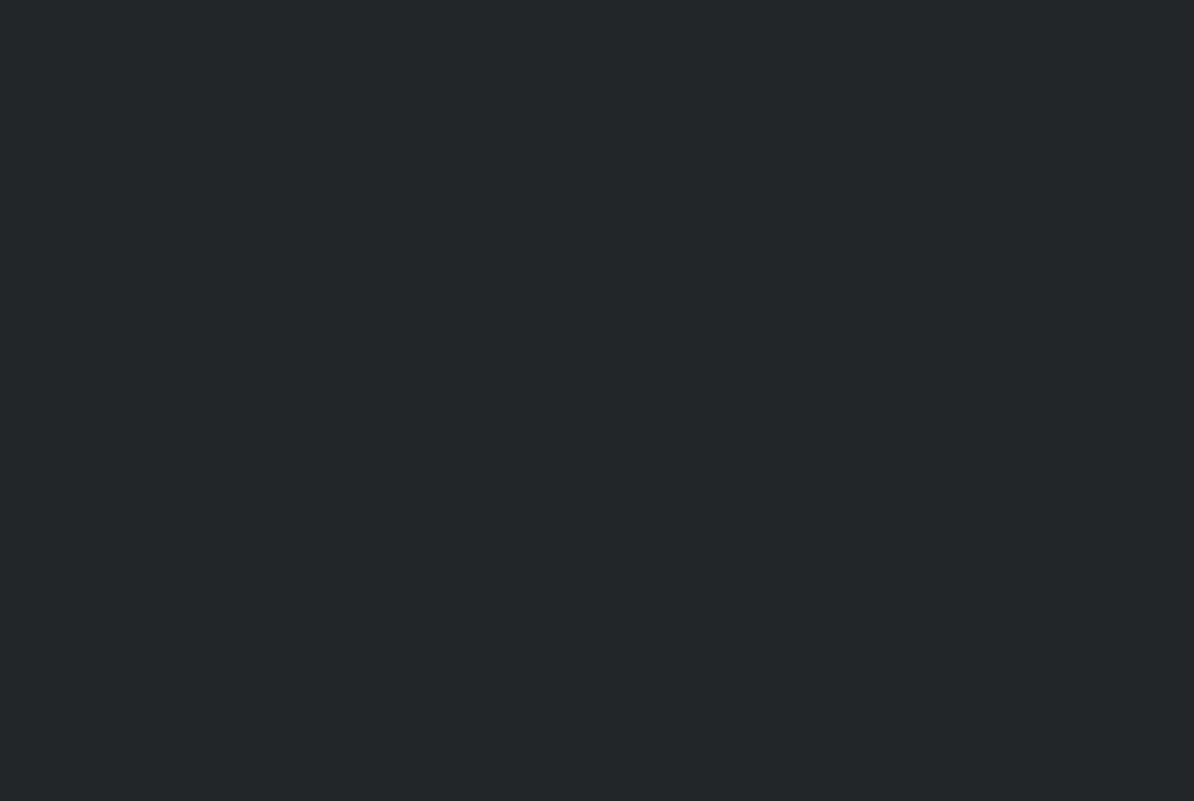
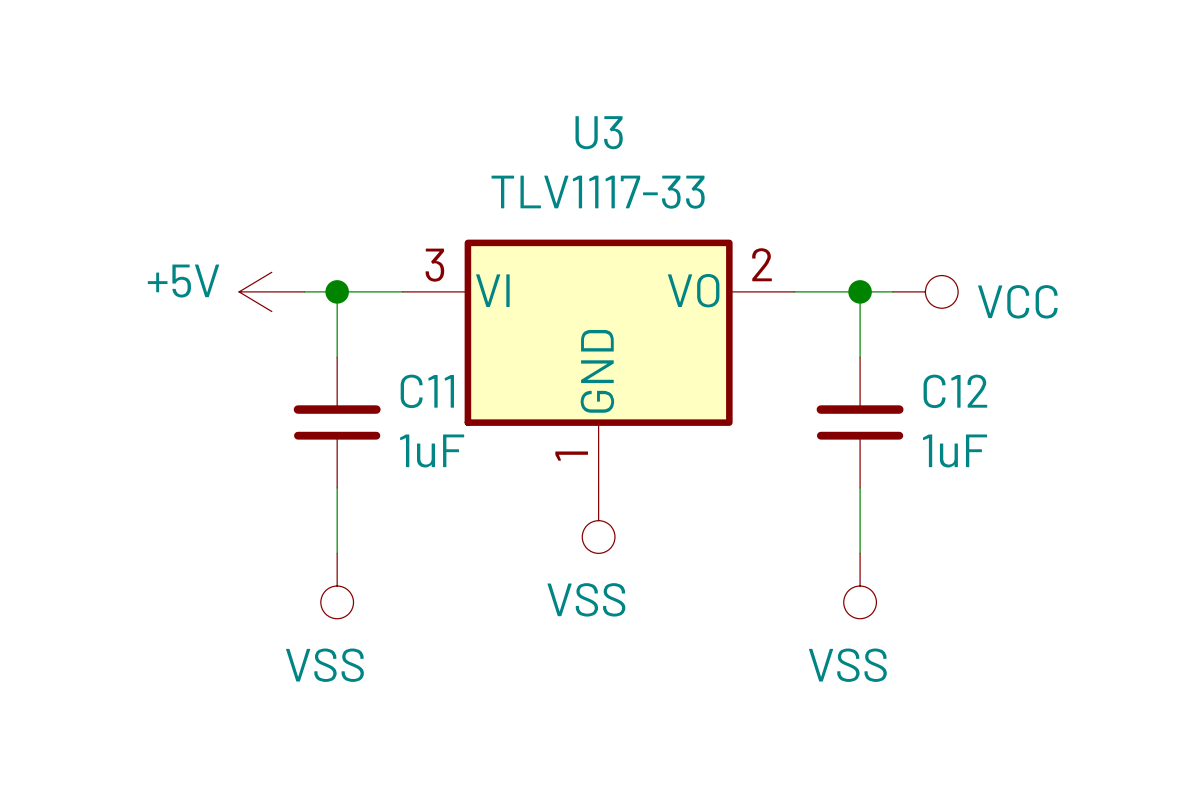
power symbol: none -> +5V (271, 291)
wire: none -> (304, 291) (402, 291)
wire: none -> (337, 291) (337, 357)
junction: none -> (337, 291)
wire: none -> (794, 291) (892, 291)
wire: none -> (860, 291) (860, 357)
junction: none -> (860, 291)
power symbol: none -> VCC (925, 291)
U3: none -> TLV1117-33 (598, 363)
C11: none -> 1uF (337, 422)
C12: none -> 1uF (860, 422)
wire: none -> (337, 487) (337, 553)
wire: none -> (860, 487) (860, 553)
power symbol: none -> VSS (598, 520)
power symbol: none -> VSS (337, 586)
power symbol: none -> VSS (860, 586)

